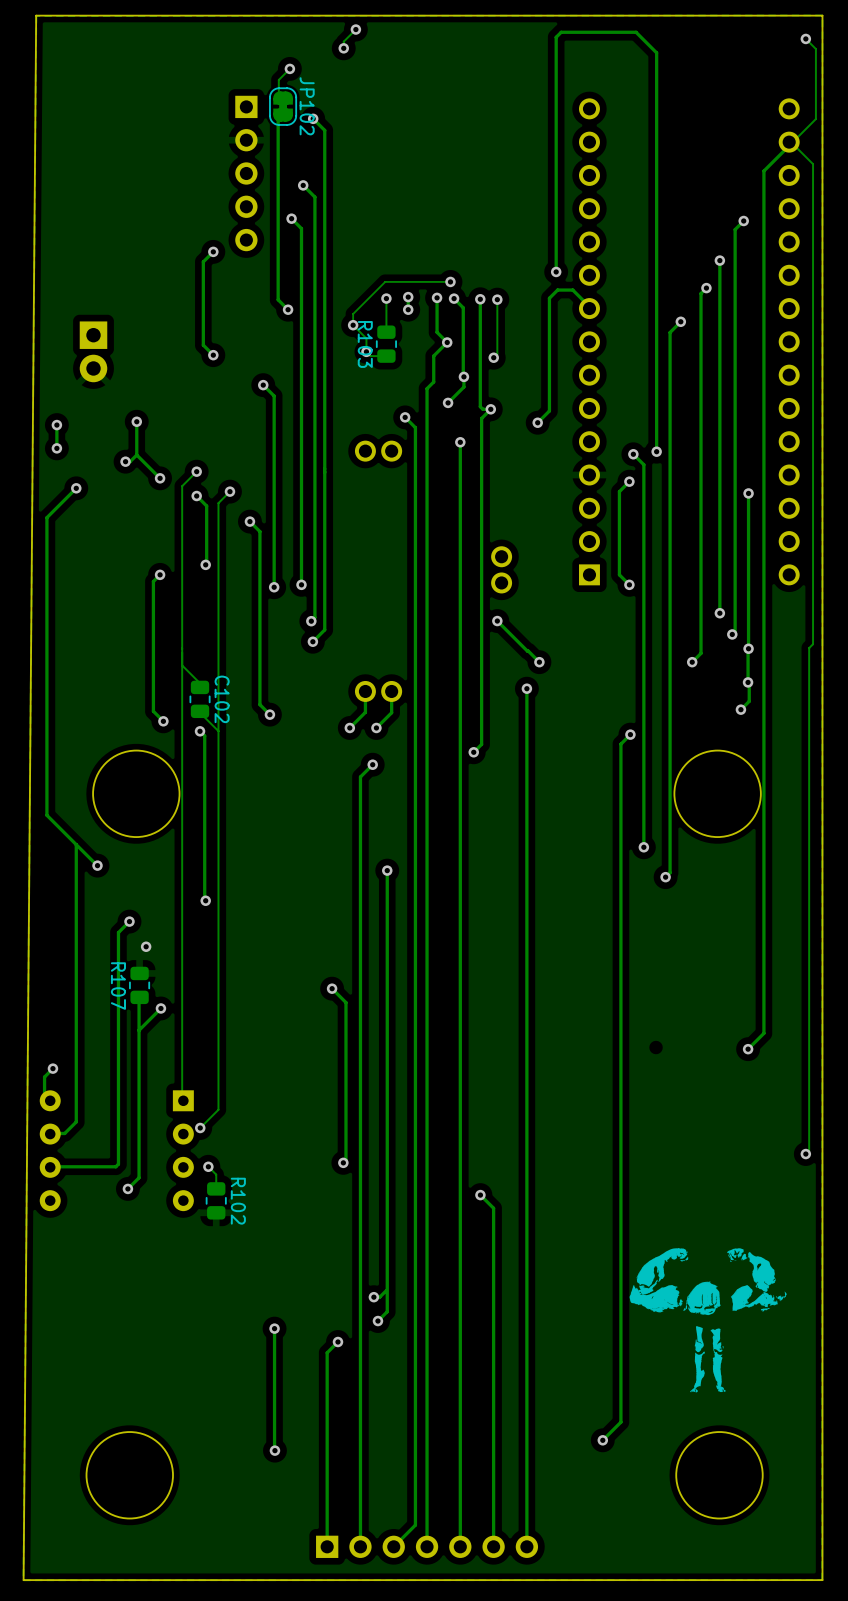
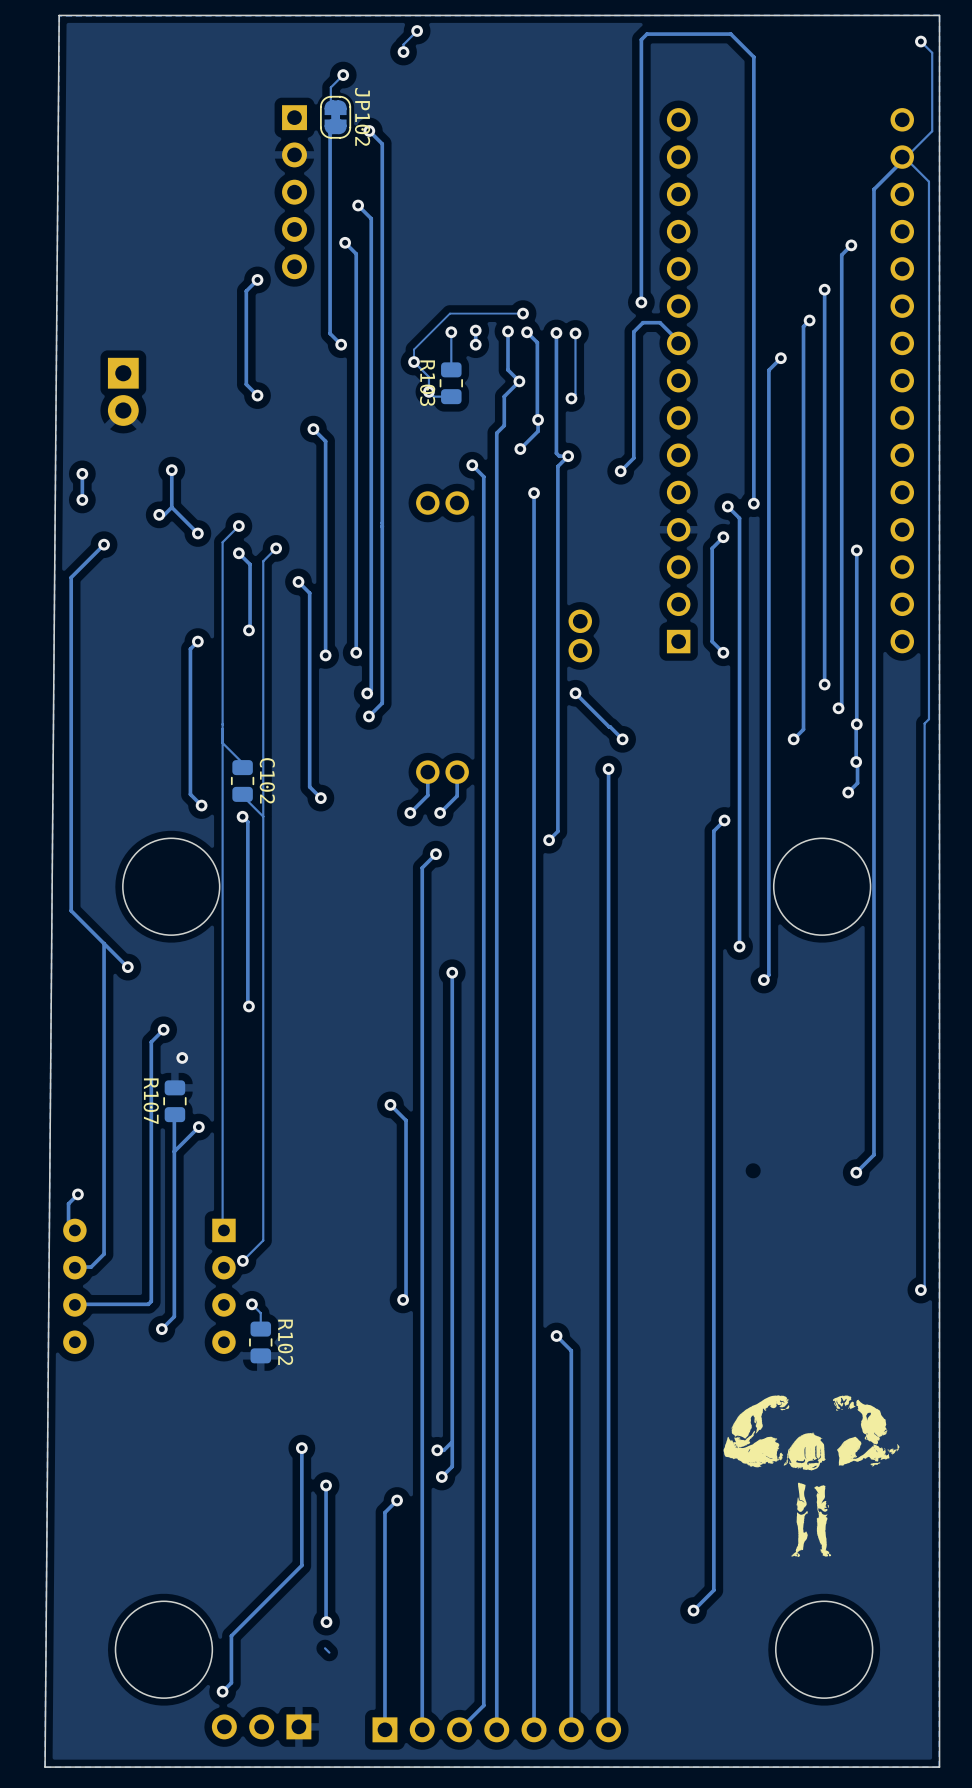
track: none -> (301, 1448) (301, 1565) (231, 1635) (231, 1682) (222, 1691)
via: none -> (301, 1448)
track: none -> (325, 1648) (329, 1652)
via: none -> (222, 1691)
part: none -> (261, 1726)

